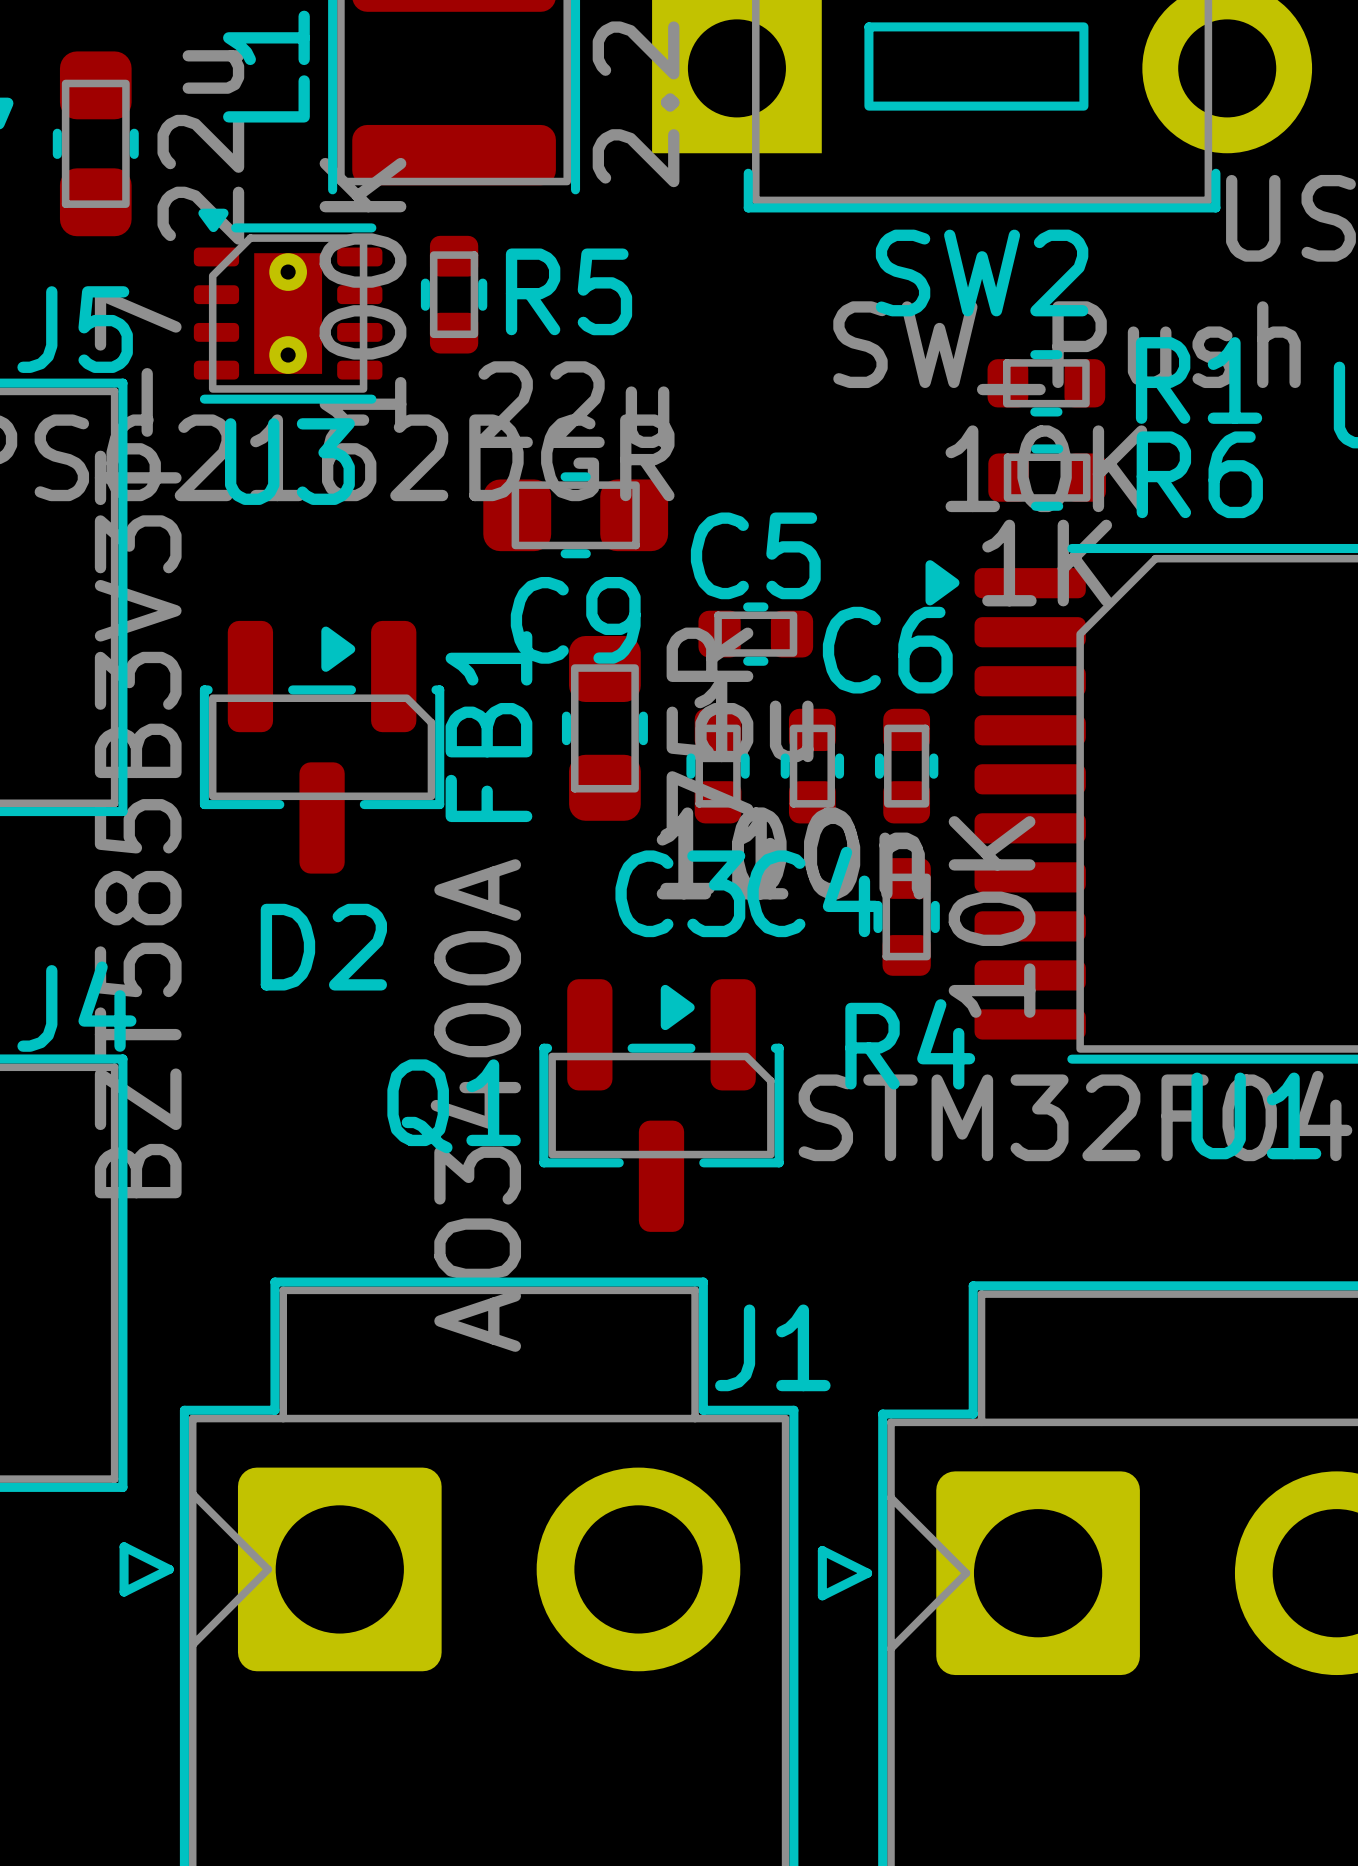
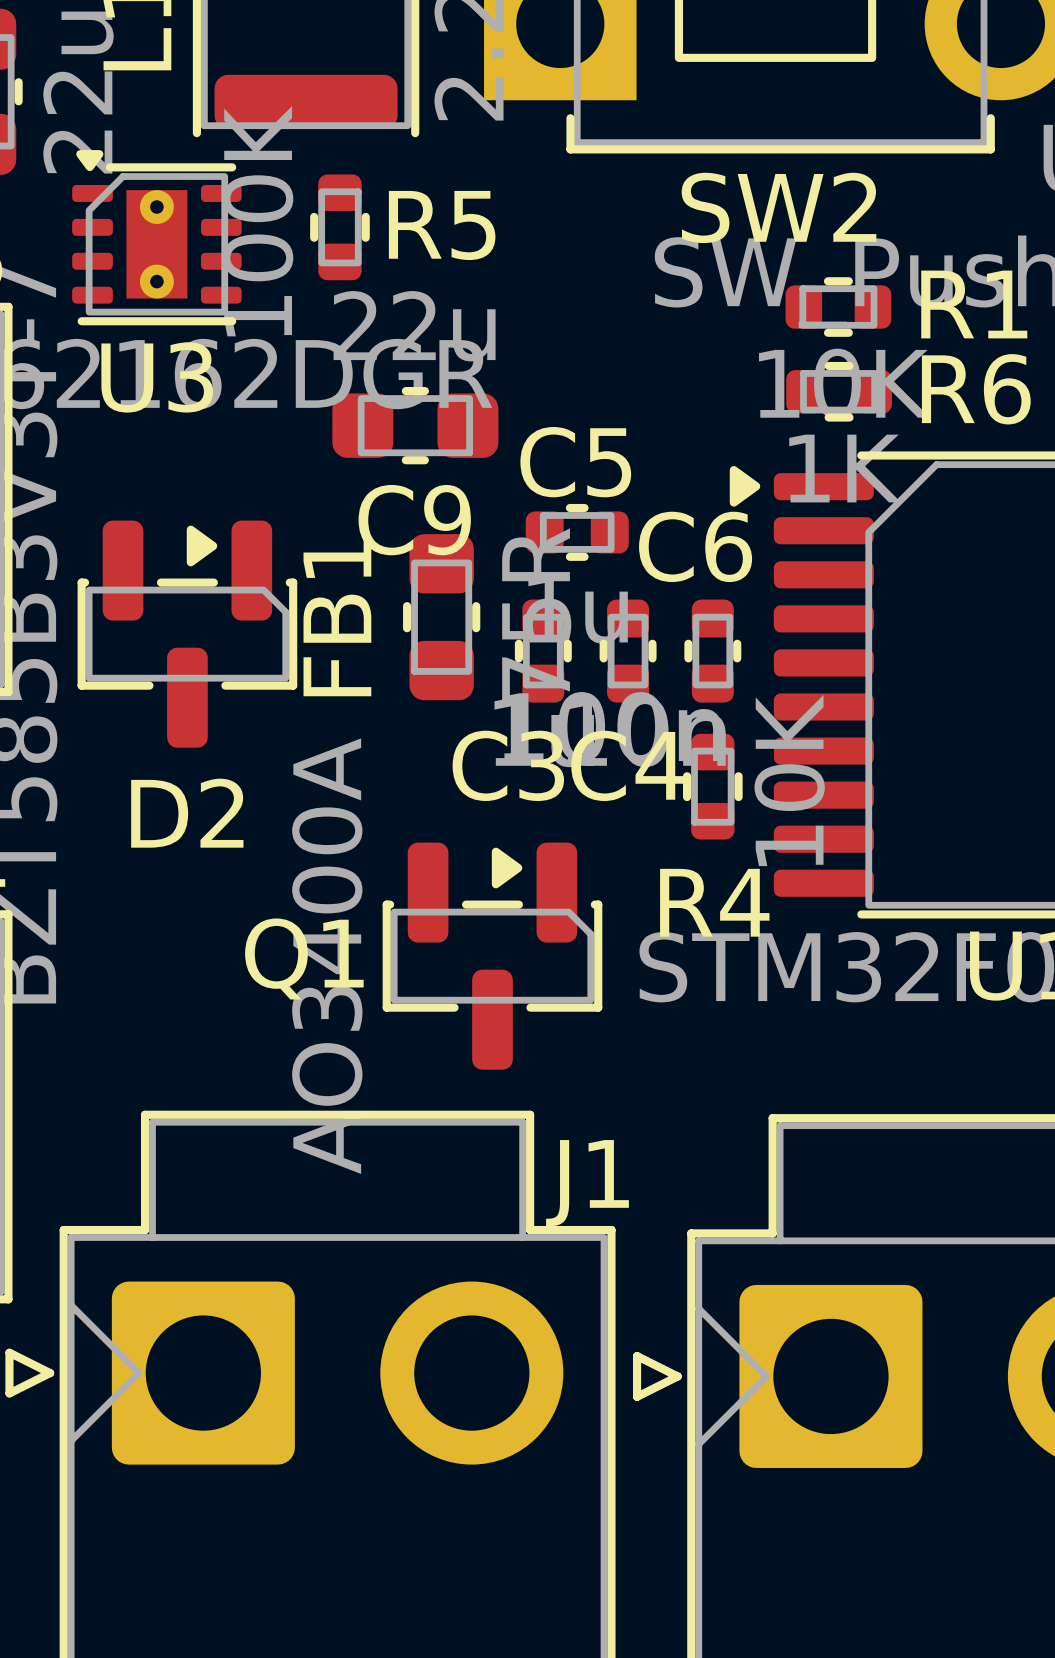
R5 position: (454, 294) -> (339, 227)

